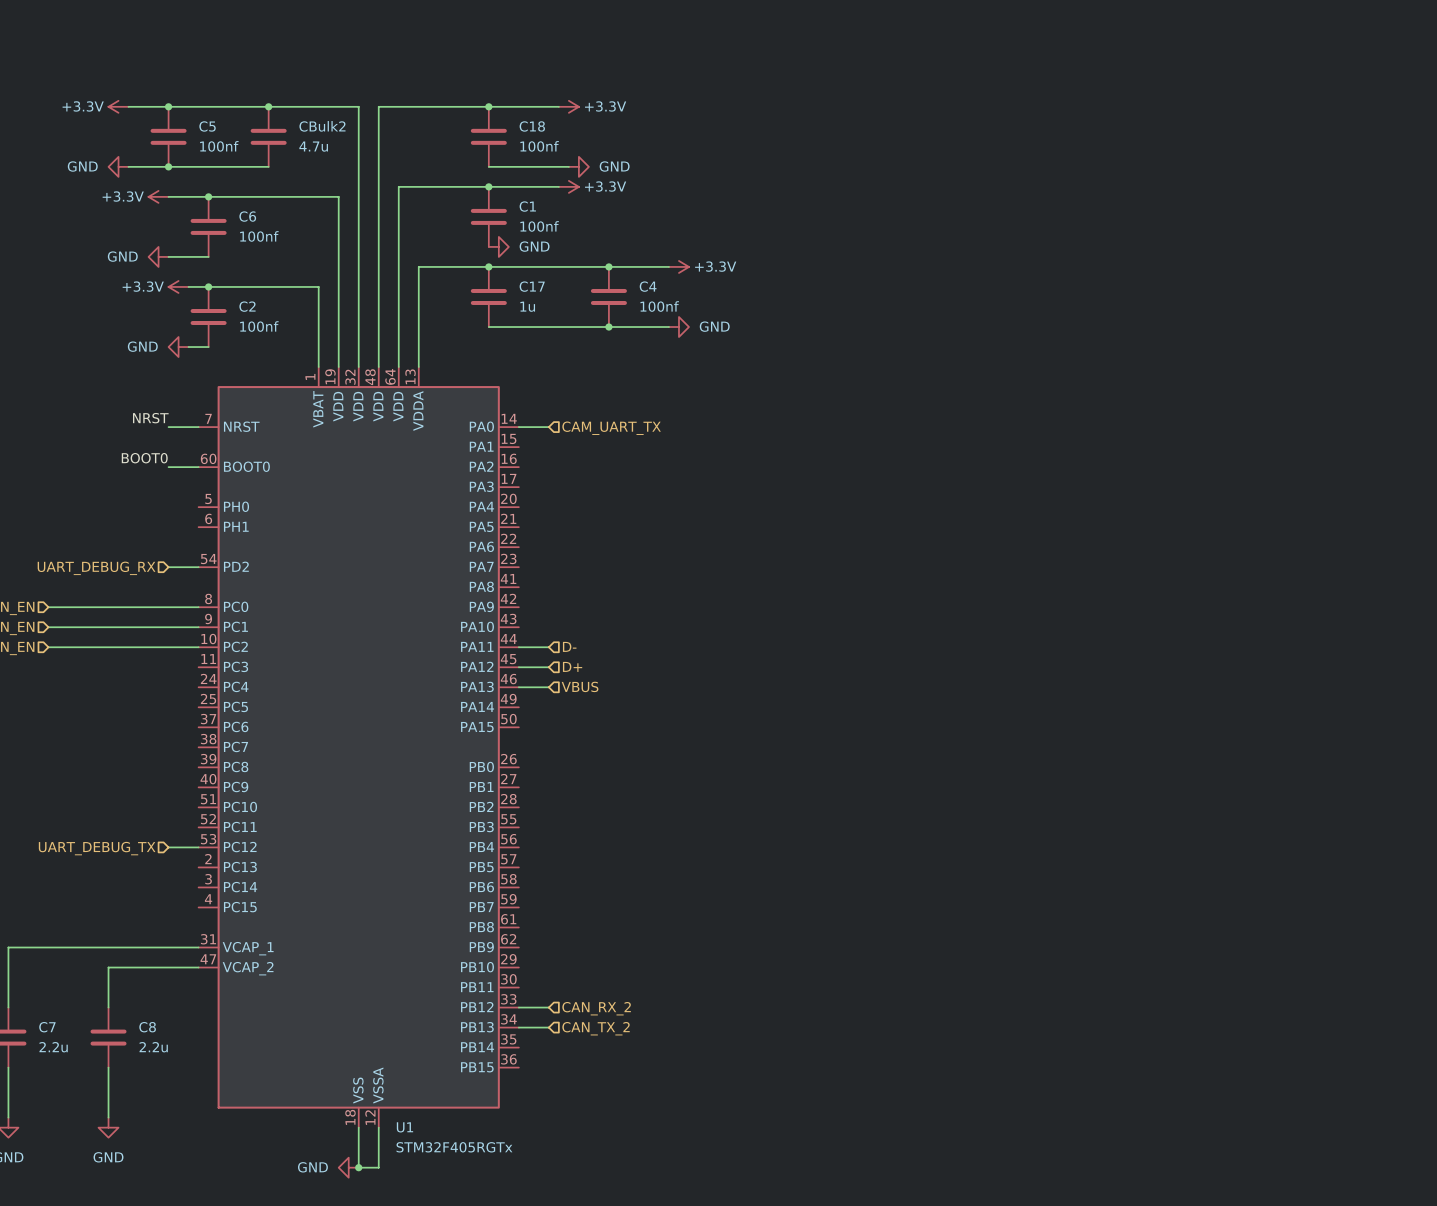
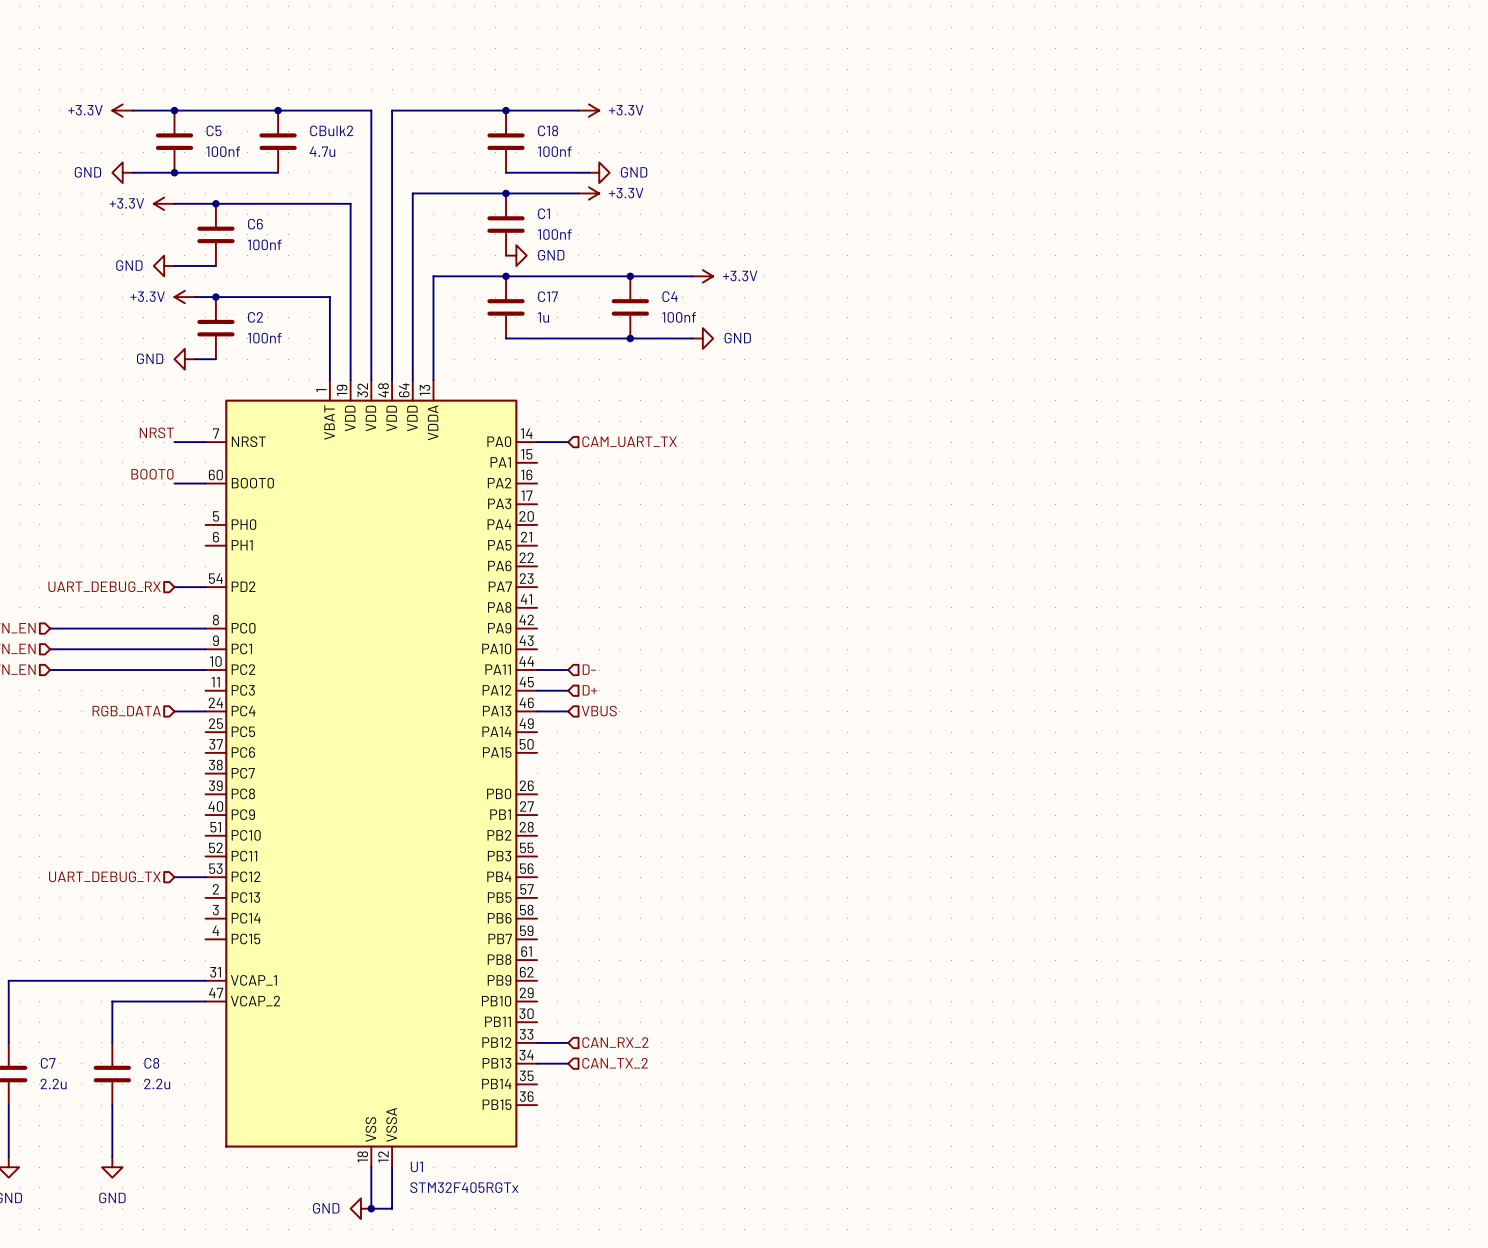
wire: none -> (174, 711) (205, 711)
hierarchical label: none -> RGB_DATA (126, 711)

